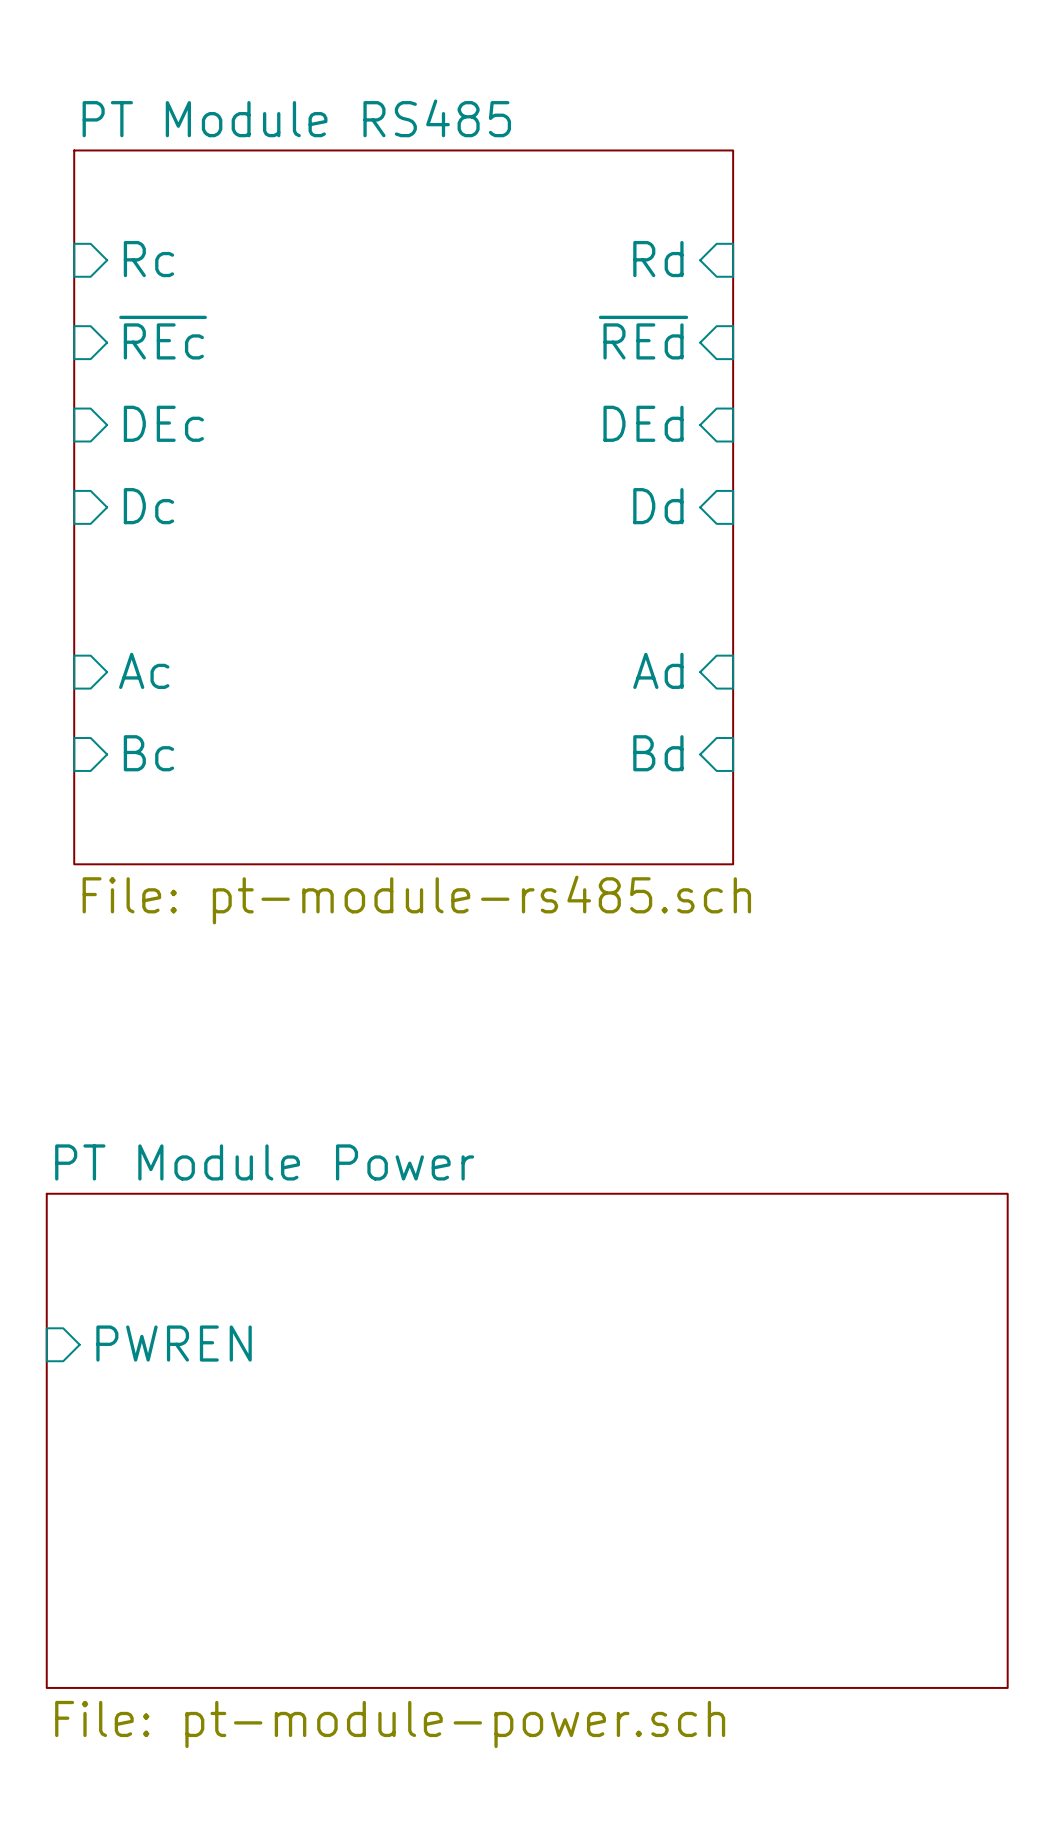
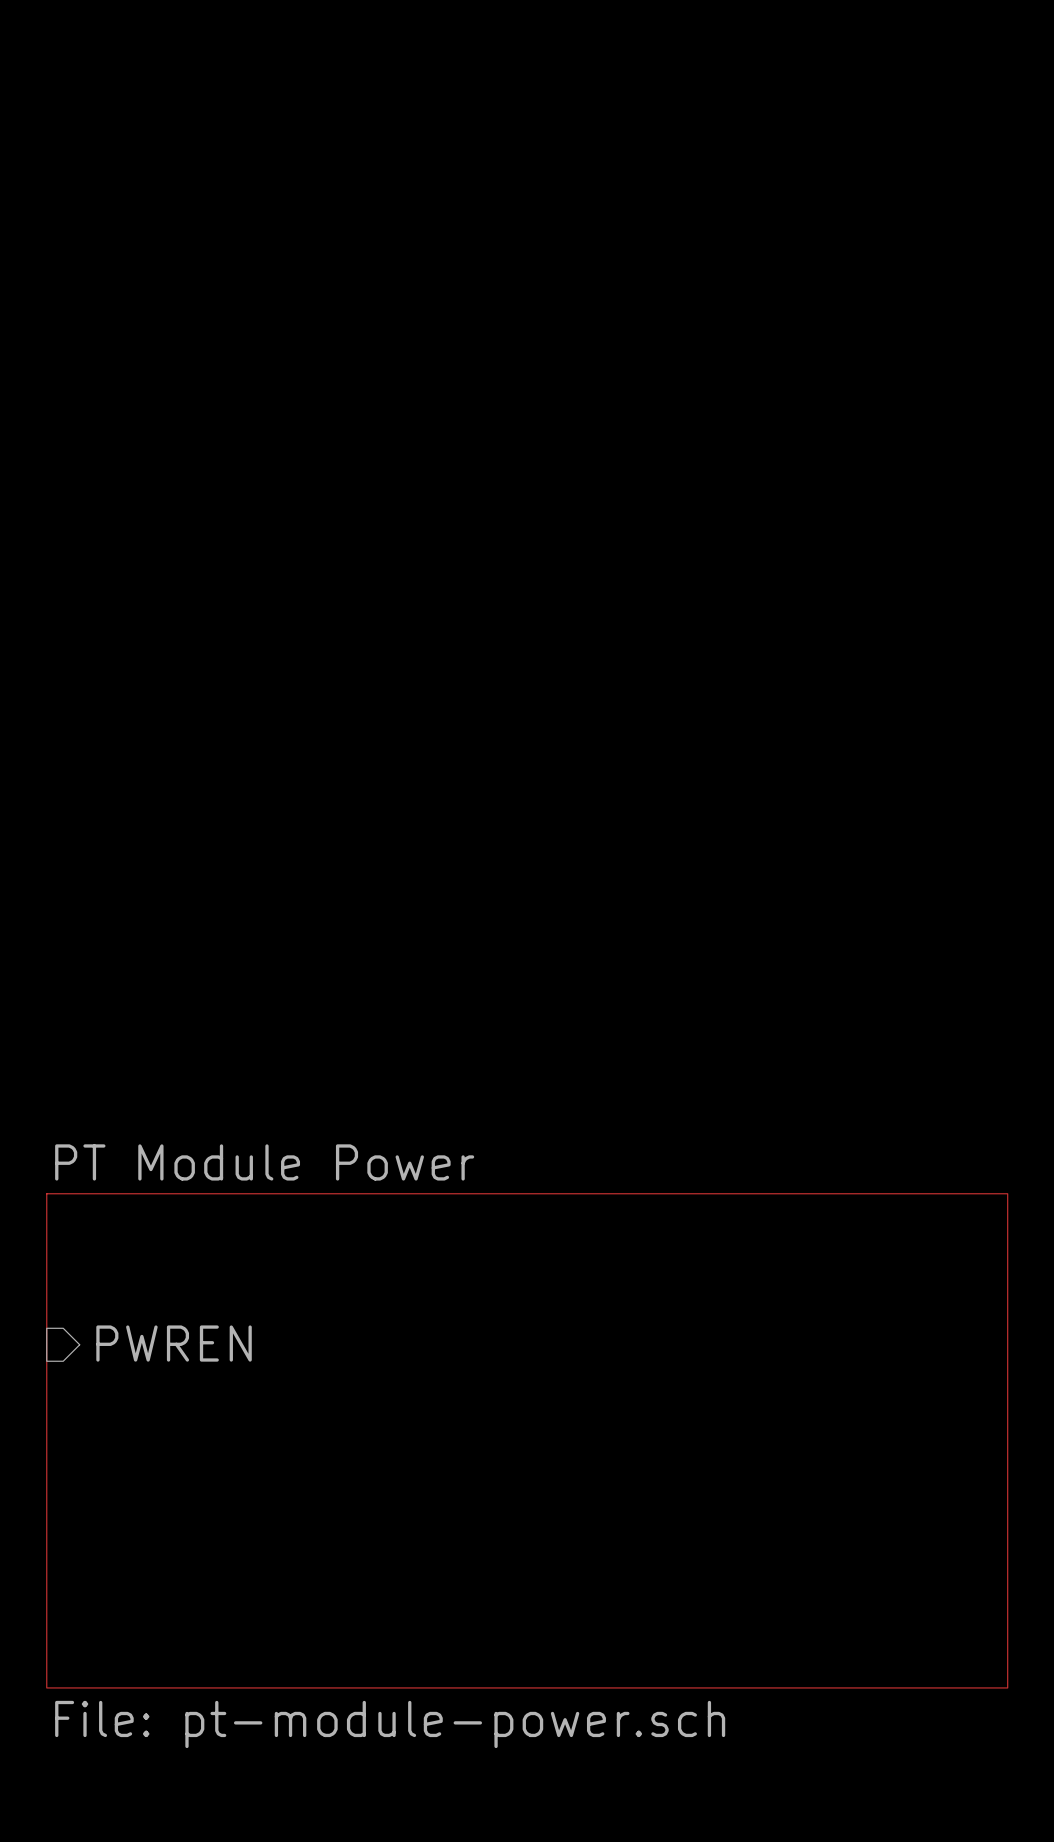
sheet pin: Rc (148, 259) -> none
sheet pin: Rd (658, 259) -> none
sheet pin: ~{REc} (163, 337) -> none
sheet pin: ~{REd} (643, 337) -> none
sheet pin: DEc (163, 423) -> none
sheet pin: DEd (643, 423) -> none
sheet pin: Dc (148, 506) -> none
sheet pin: Dd (658, 506) -> none
sheet PT Module RS485: File: pt-module-rs485.sch (403, 507) -> none
sheet pin: Ac (144, 670) -> none
sheet pin: Ad (658, 670) -> none
sheet pin: Bc (148, 753) -> none
sheet pin: Bd (658, 753) -> none

